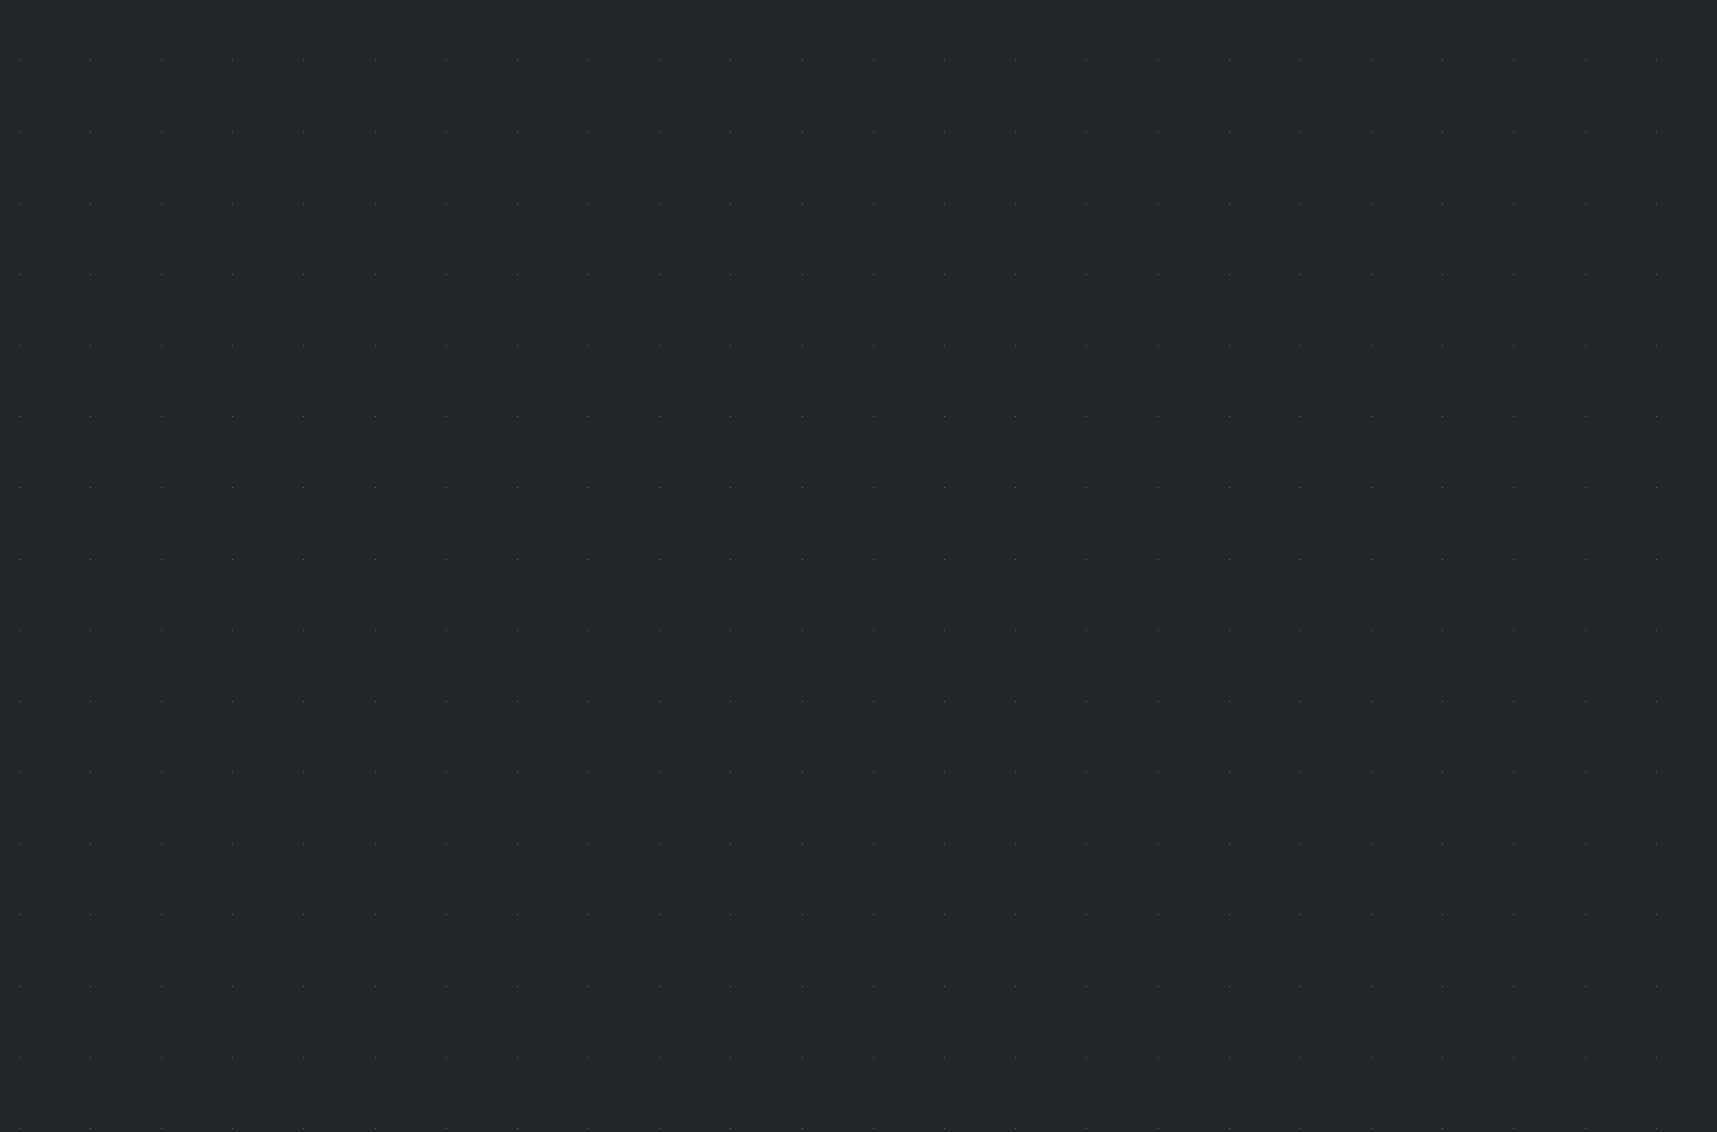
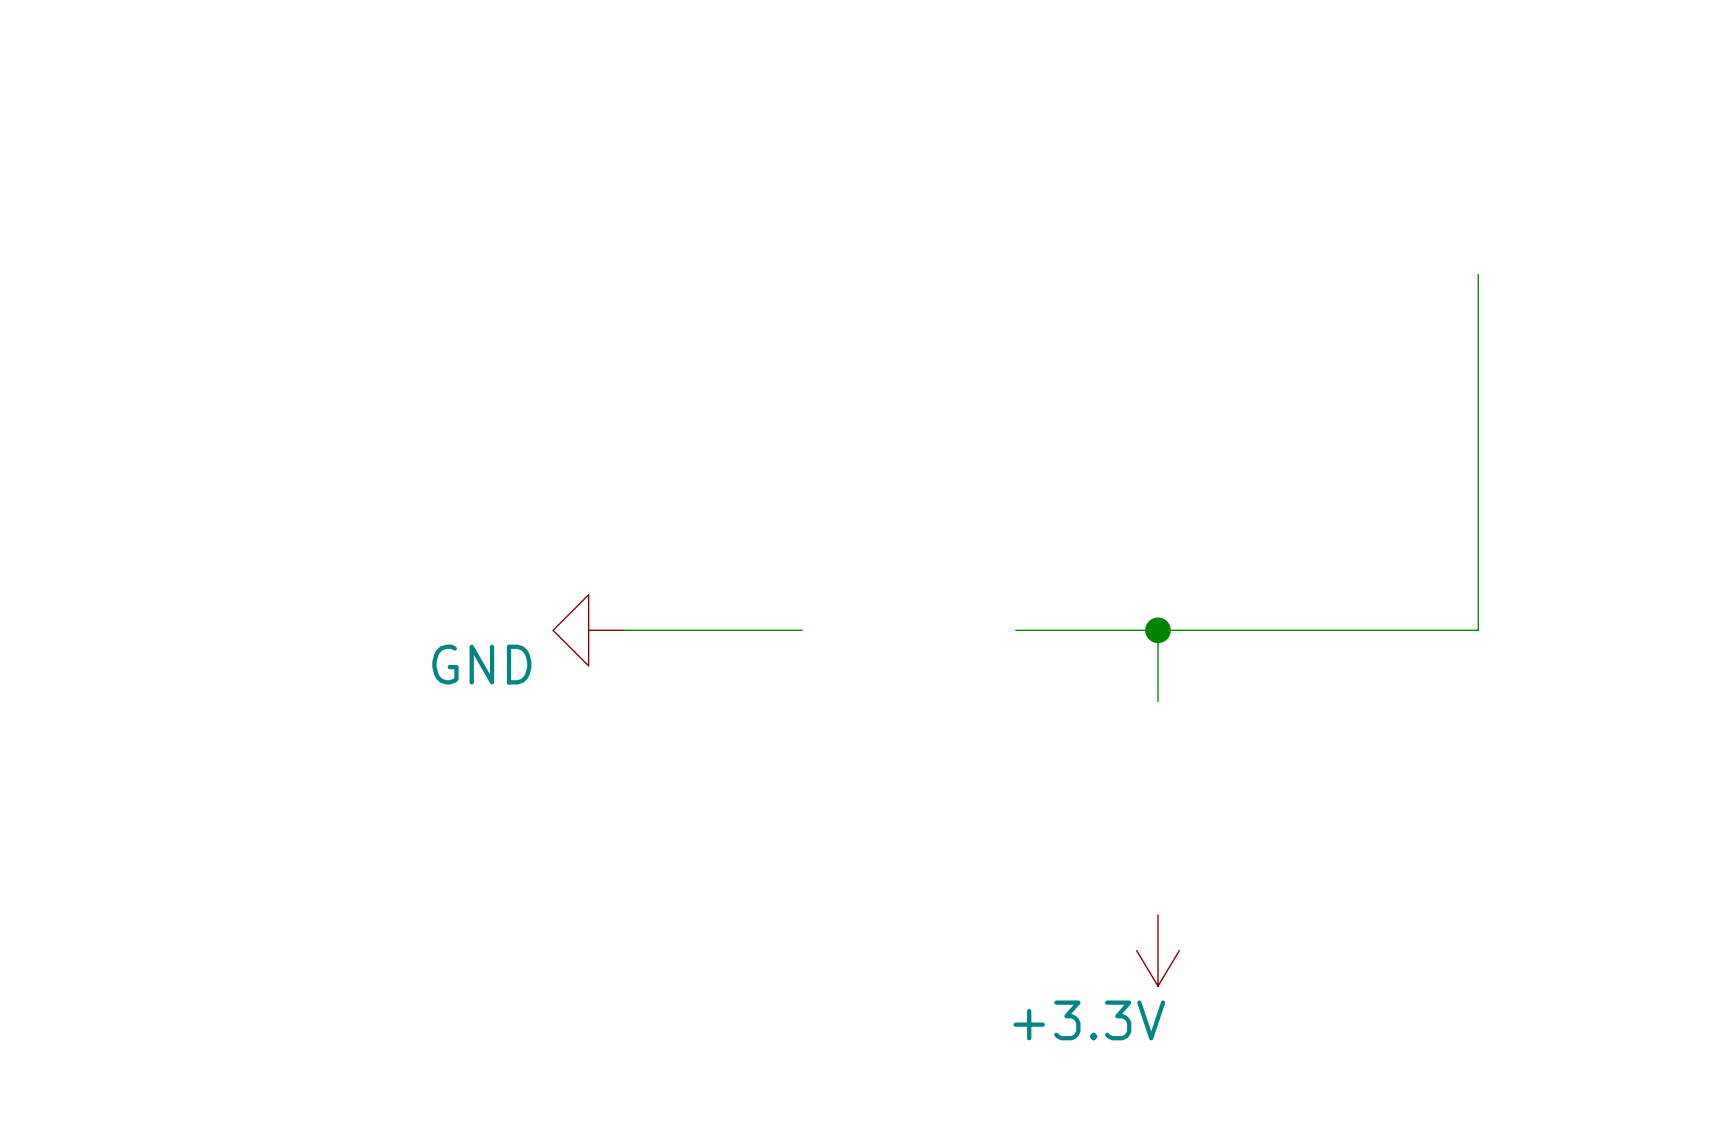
wire: none -> (1478, 274) (1478, 630) (1015, 630)
power symbol: none -> GND (588, 630)
wire: none -> (624, 630) (802, 630)
wire: none -> (1158, 630) (1158, 701)
junction: none -> (1158, 630)
power symbol: none -> +3.3V (1158, 950)

